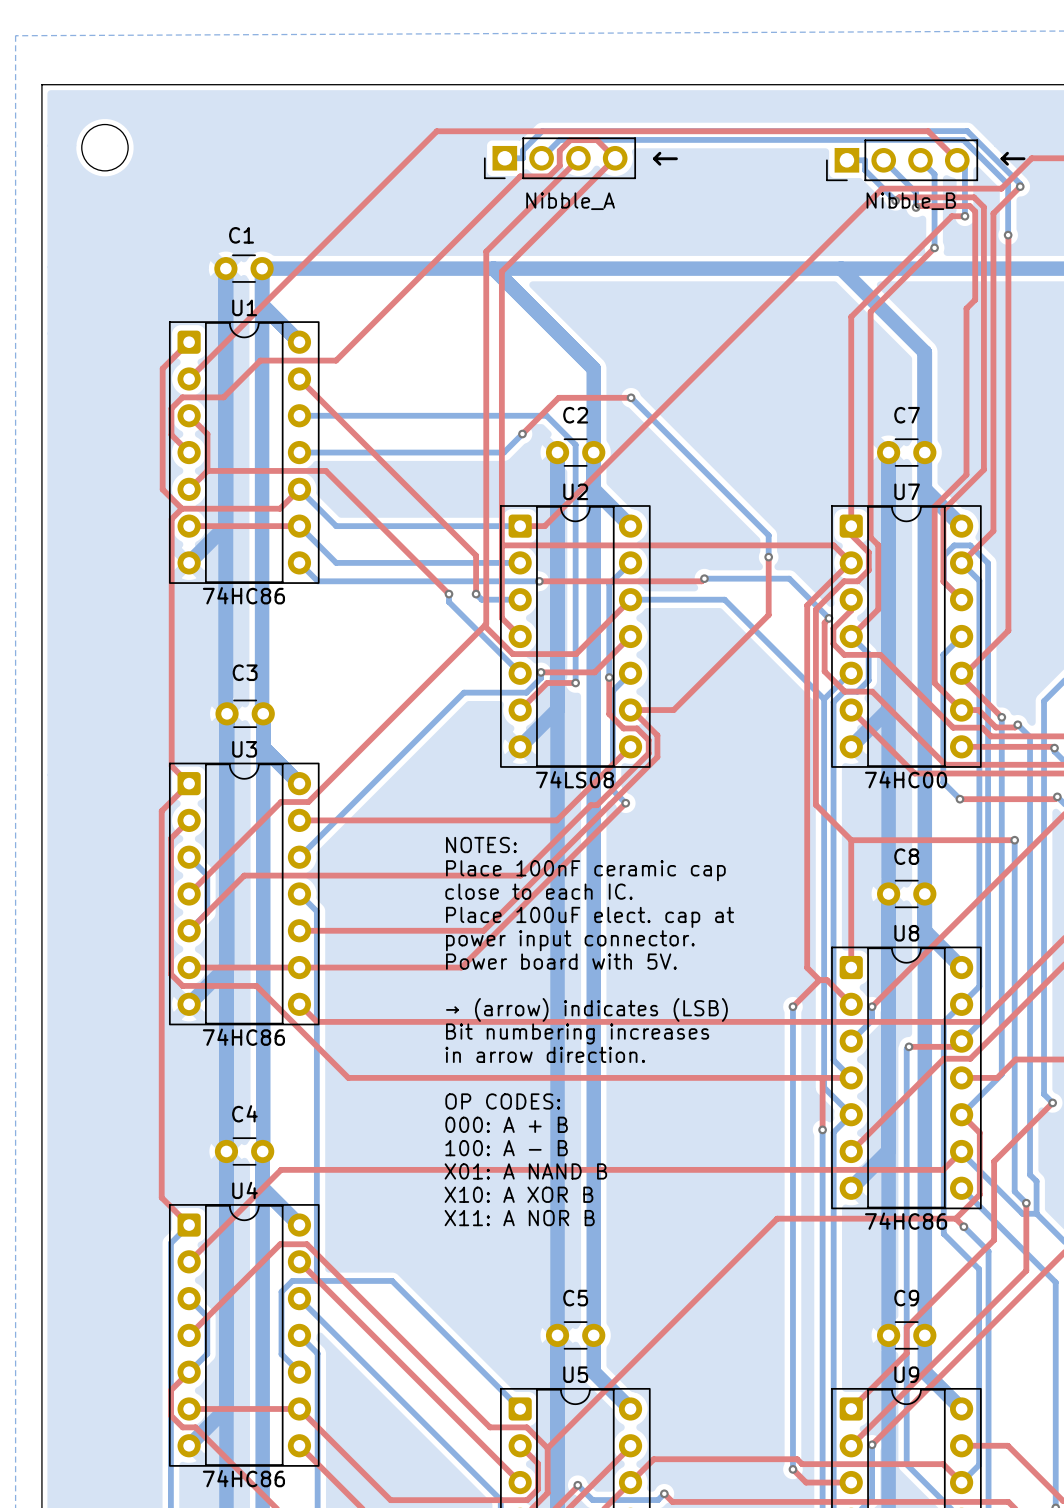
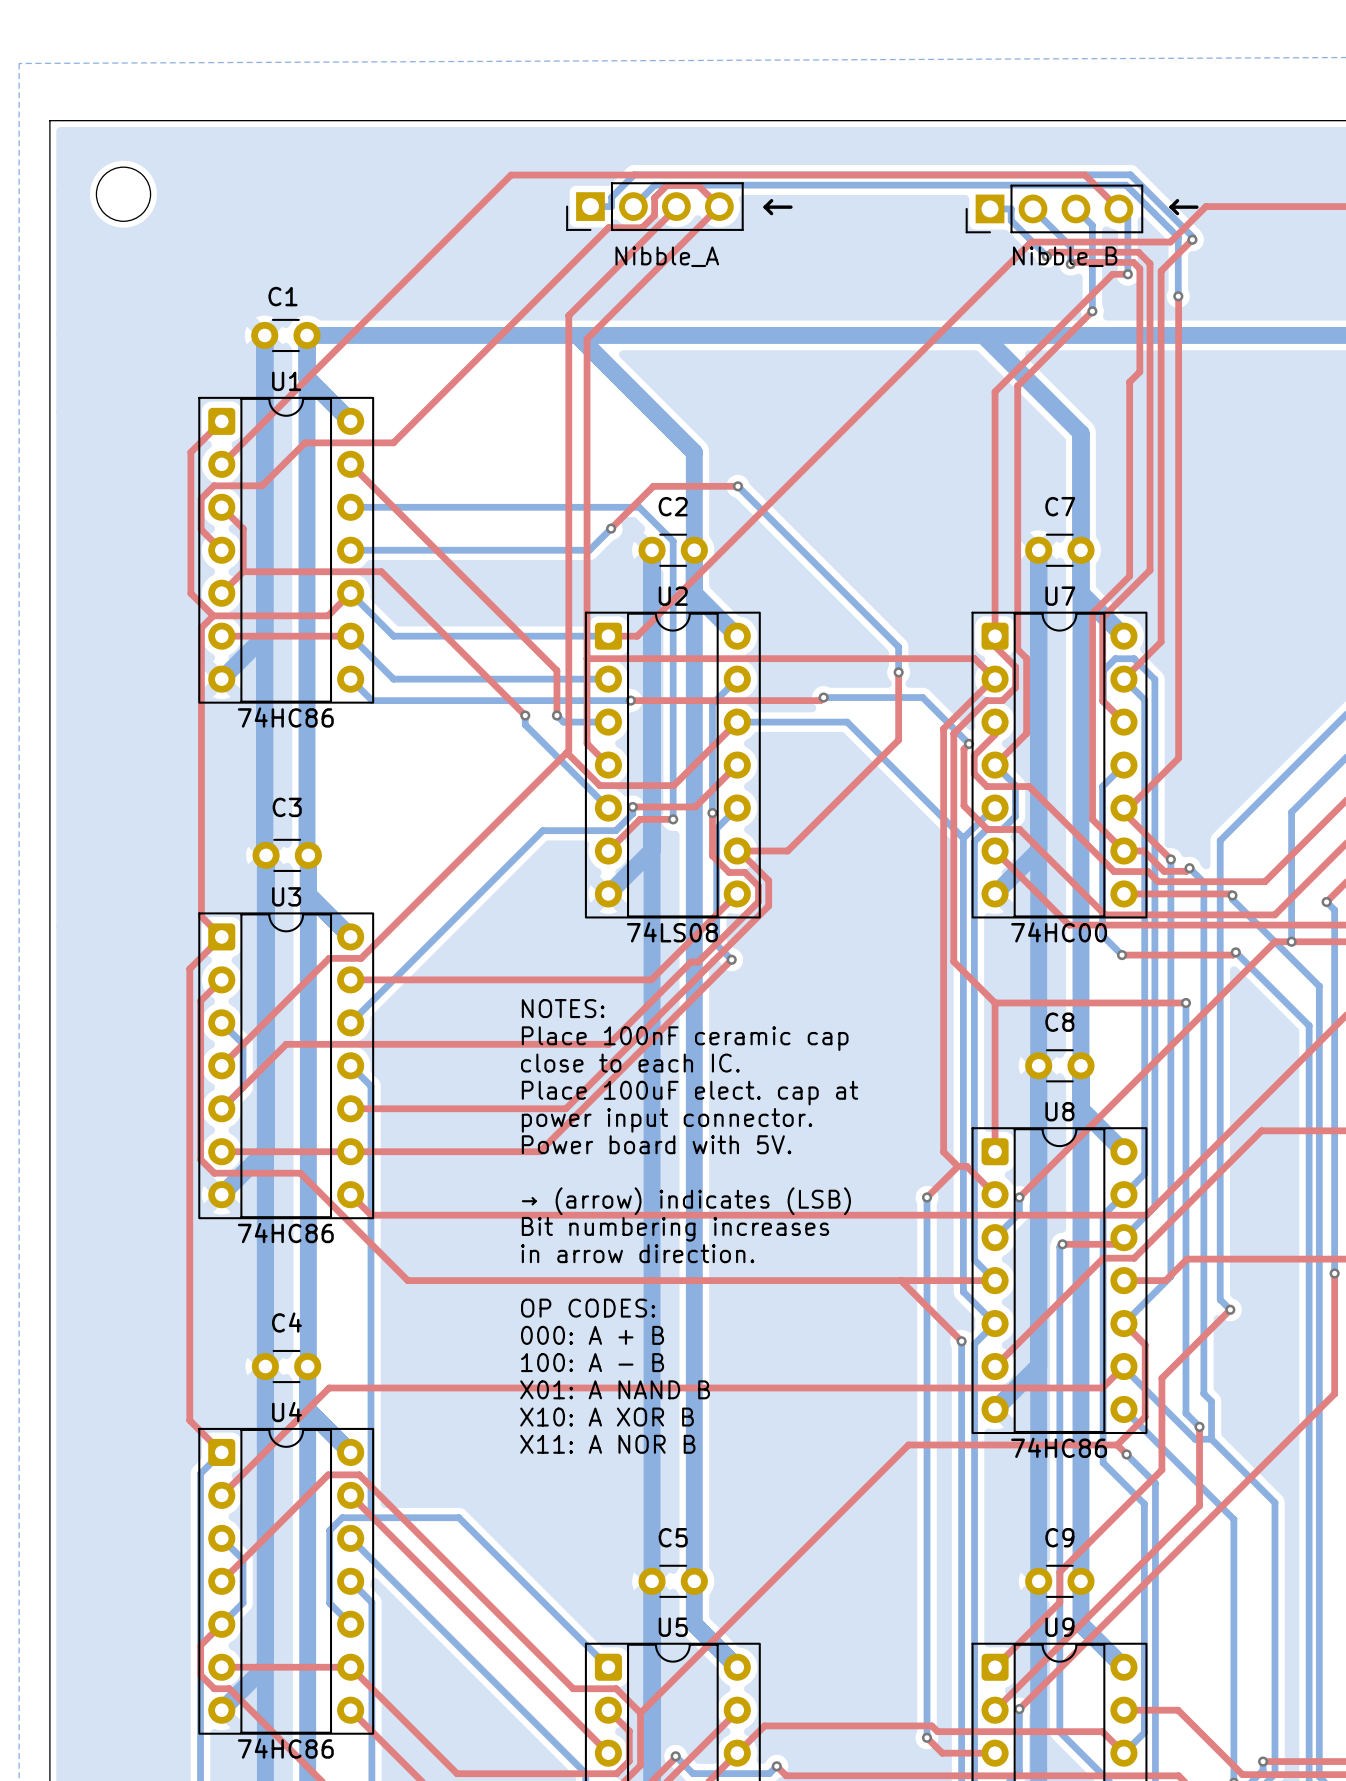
top track: (822, 1077) (822, 1129) -> (900, 1280) (961, 1341)

